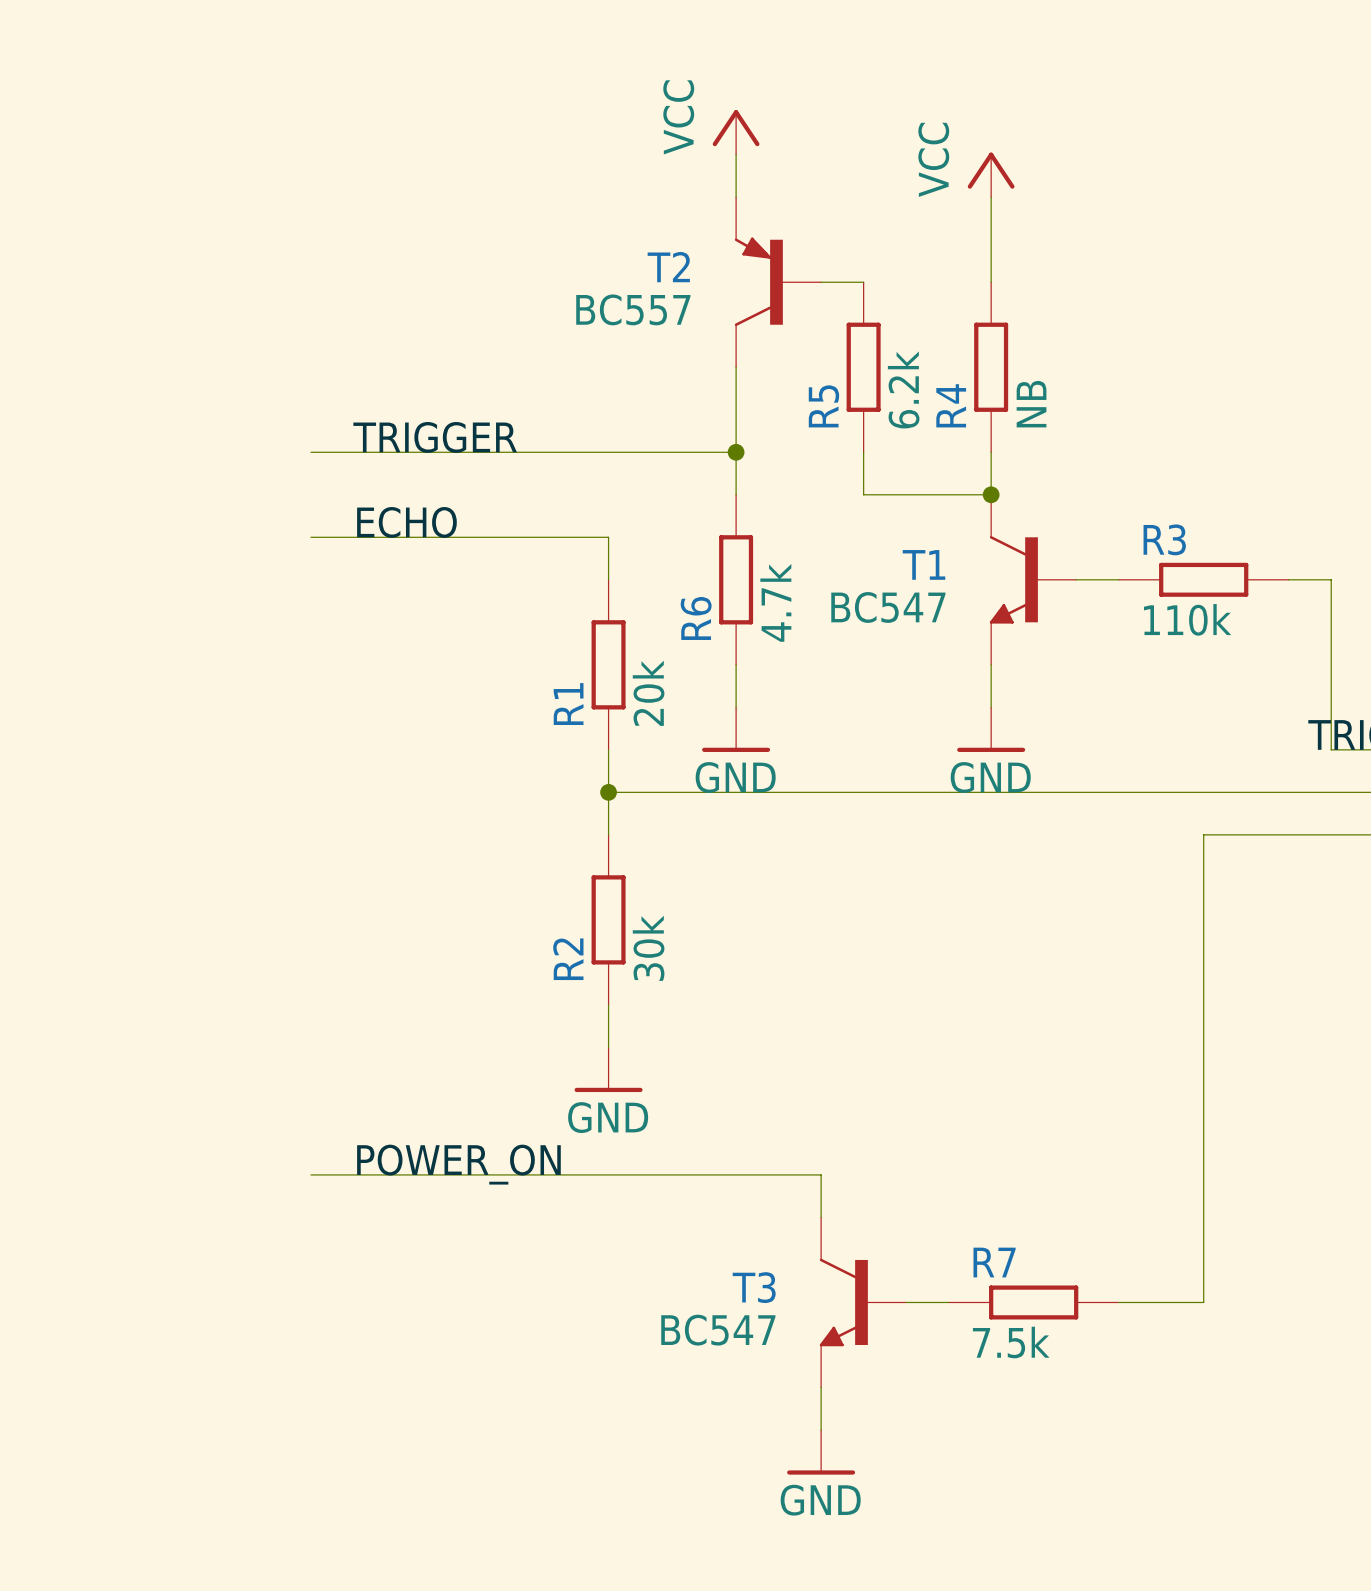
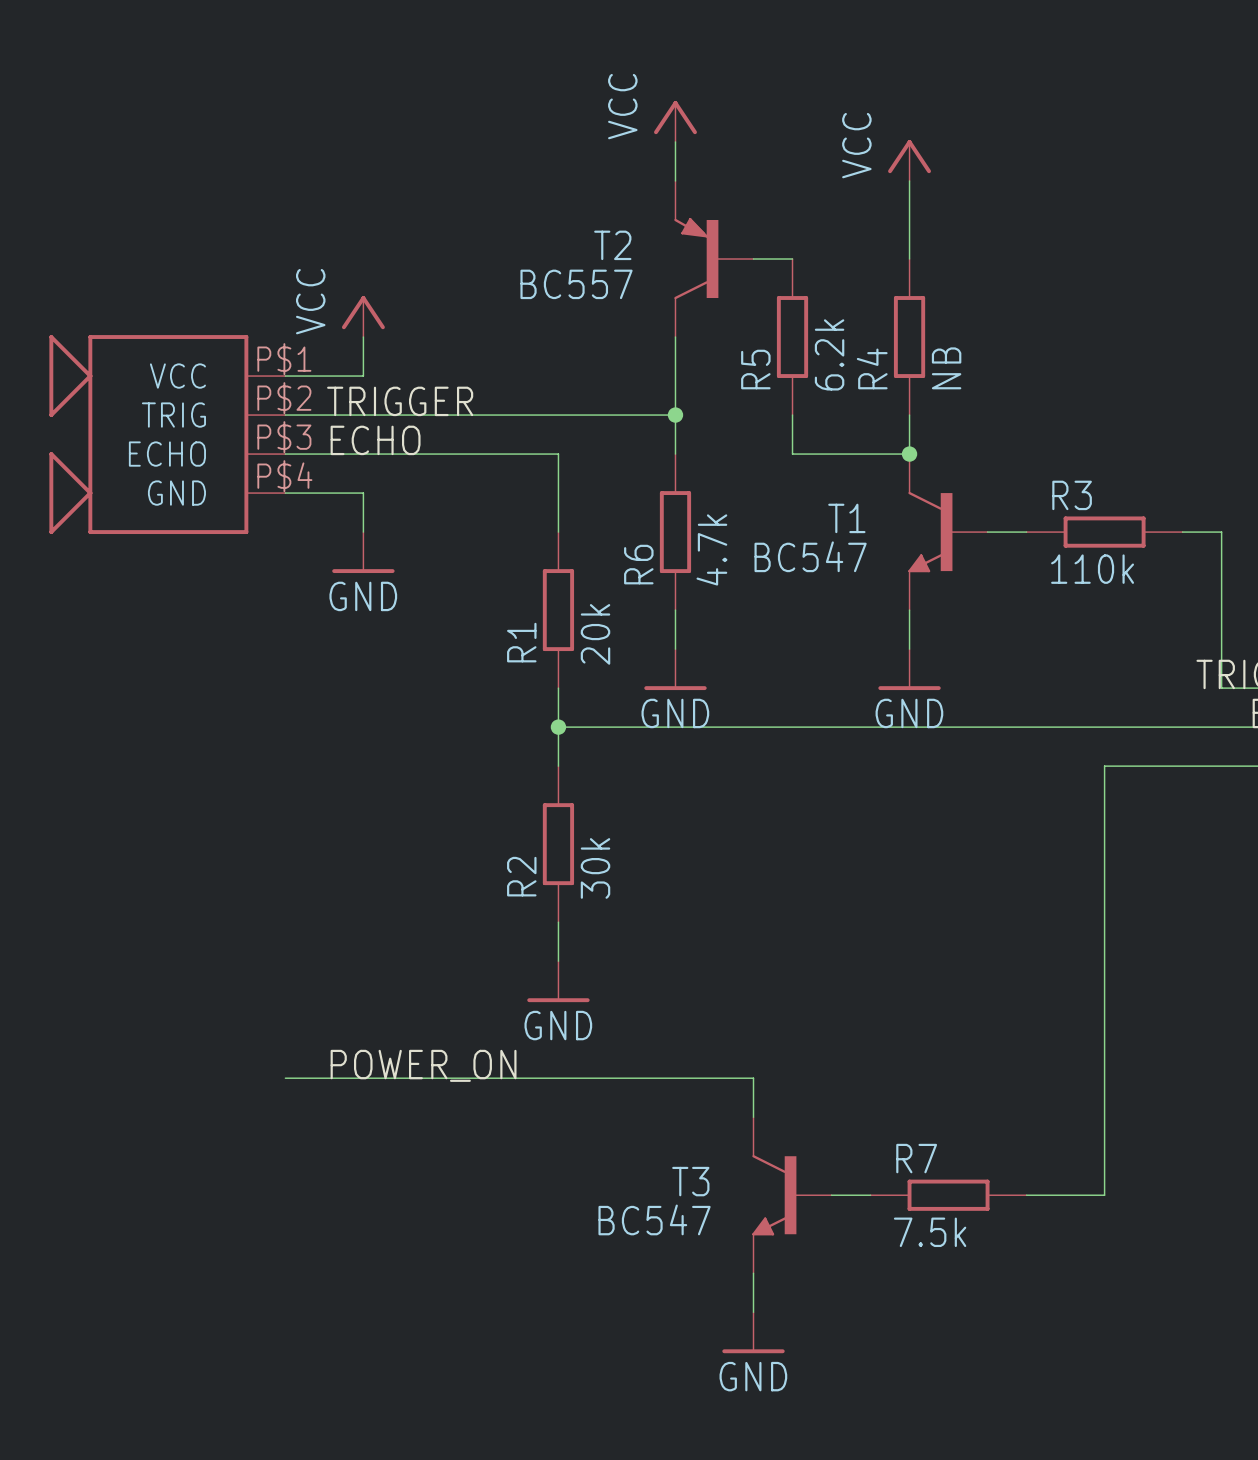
power symbol: none -> VCC (363, 316)
wire: none -> (363, 337) (363, 376) (285, 376)
part: none -> (167, 434)
label position: ECHO (406, 522) -> ECHO (375, 440)
wire: (396, 537) (608, 537) -> (285, 454) (558, 454) (558, 493)
wire: none -> (363, 493) (363, 532)
power symbol: none -> GND (363, 552)

